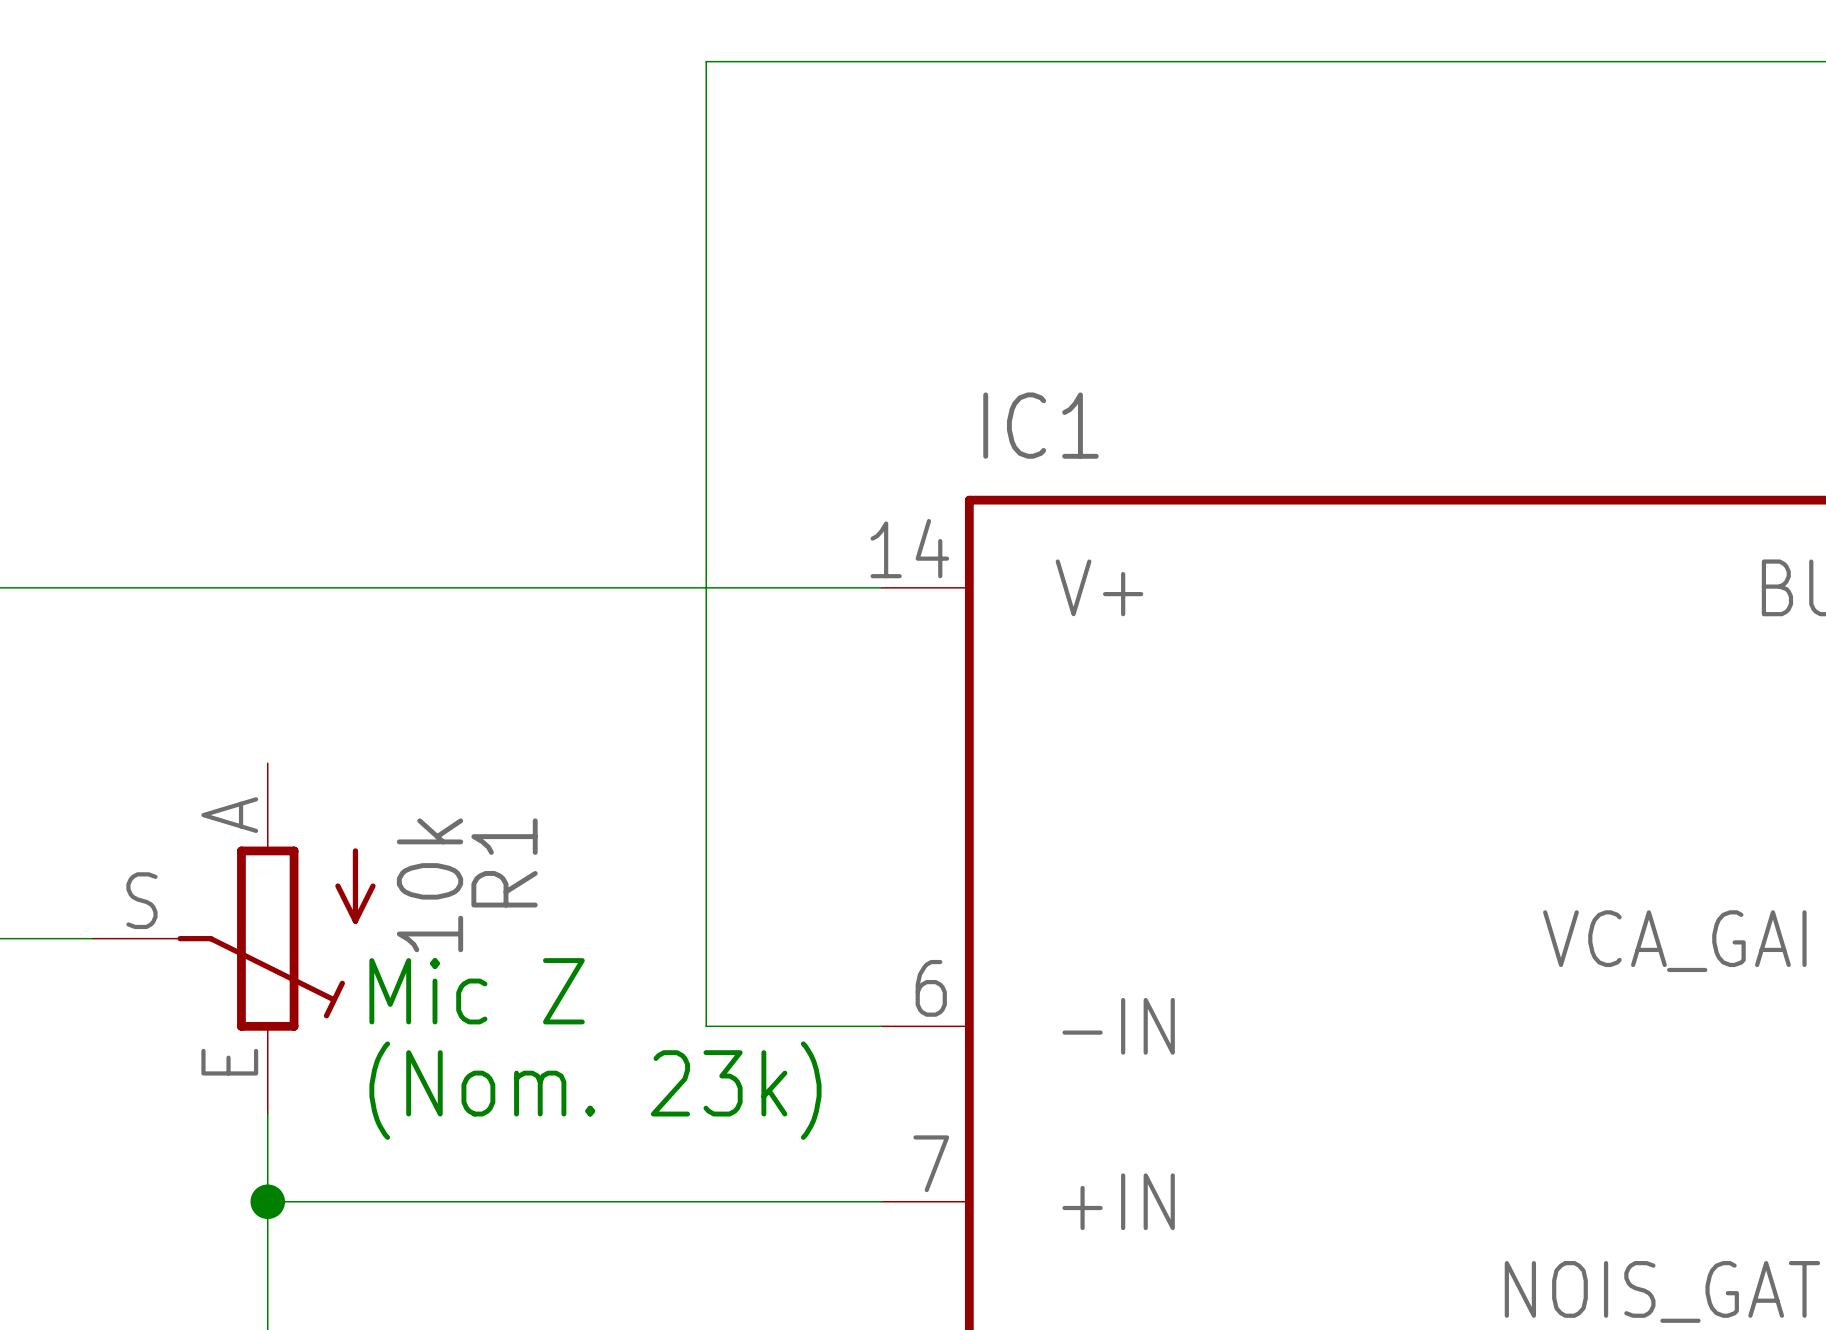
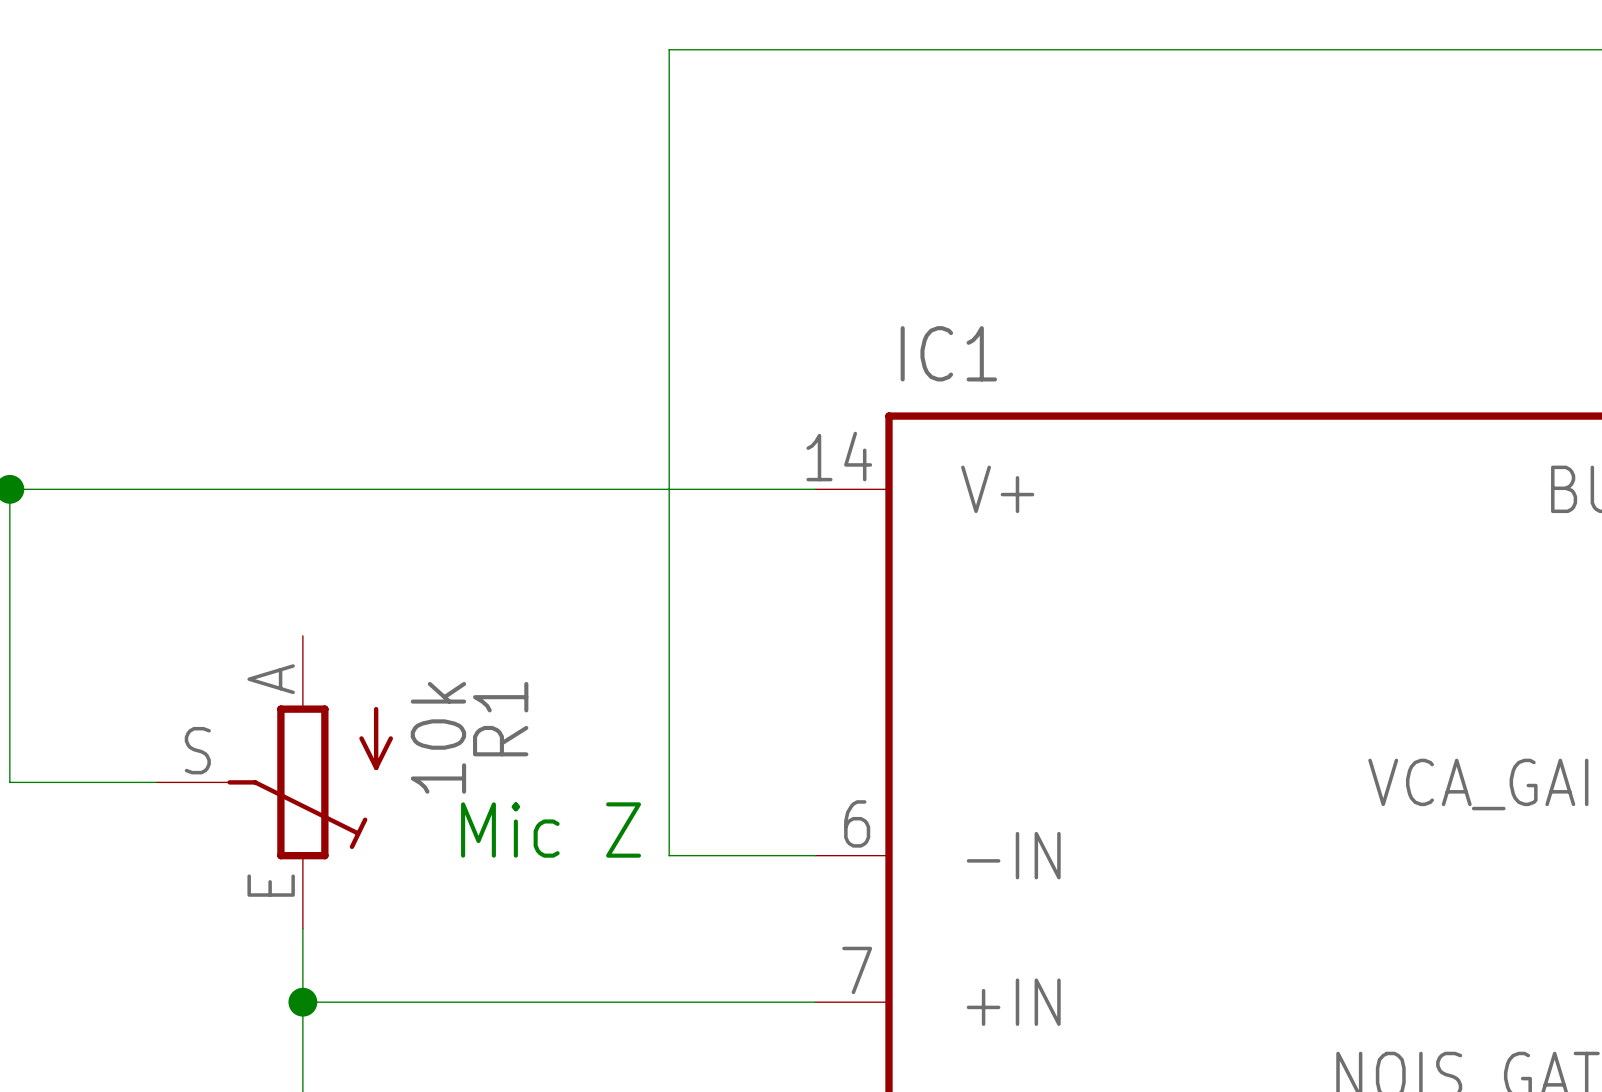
text position: Mic Z (477, 991) -> Mic Z (551, 830)
text: (Nom. 23k) (595, 1090) -> none

